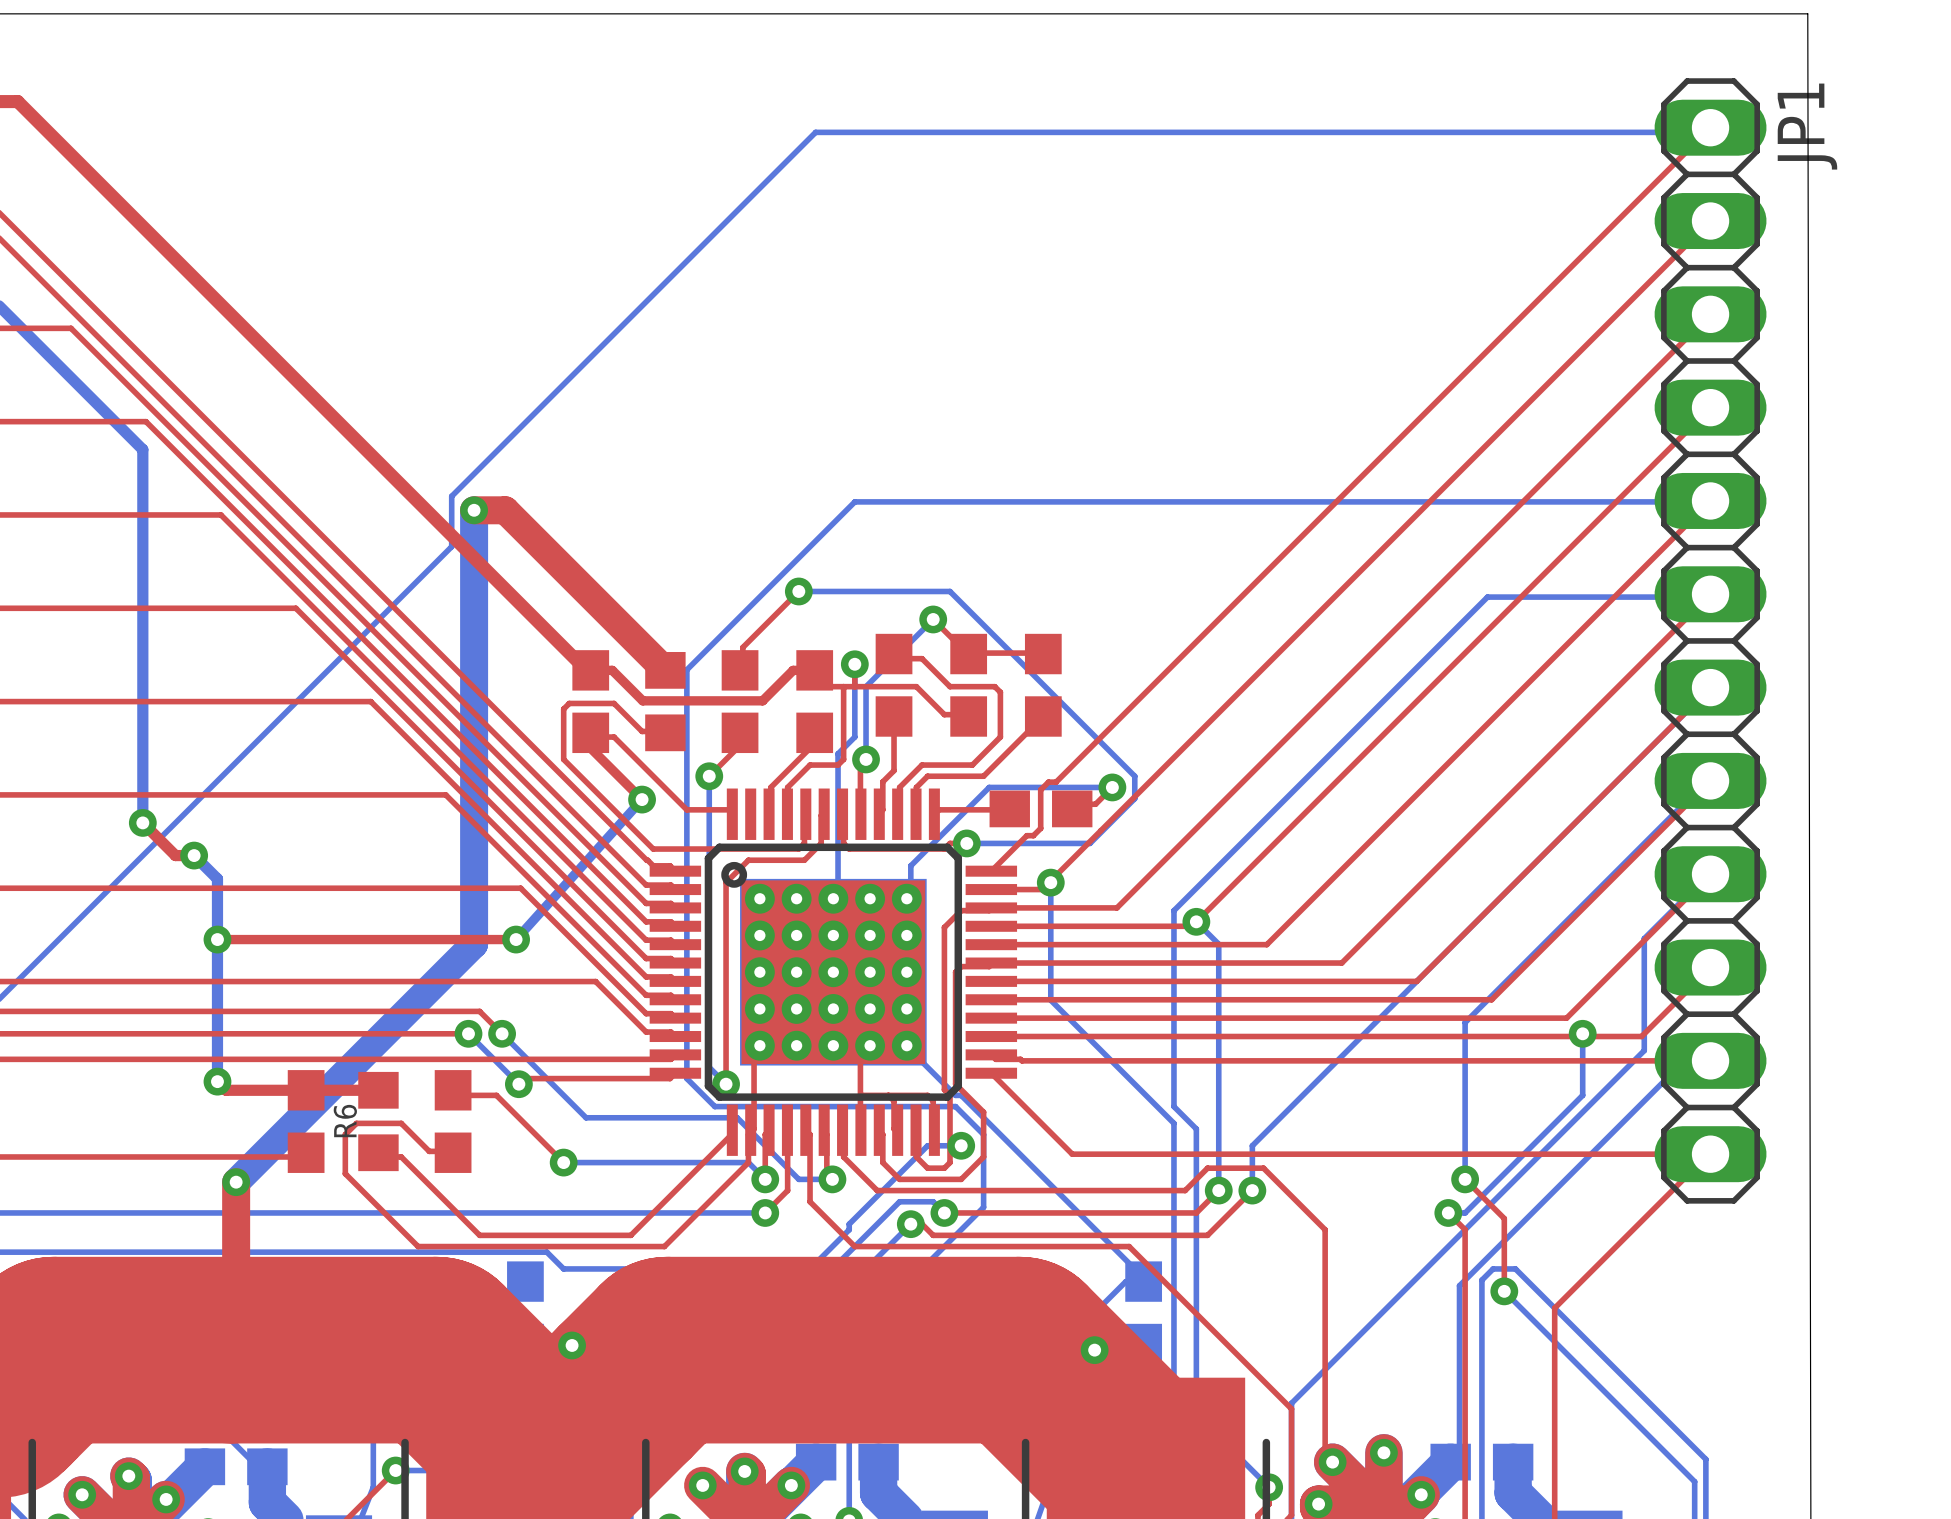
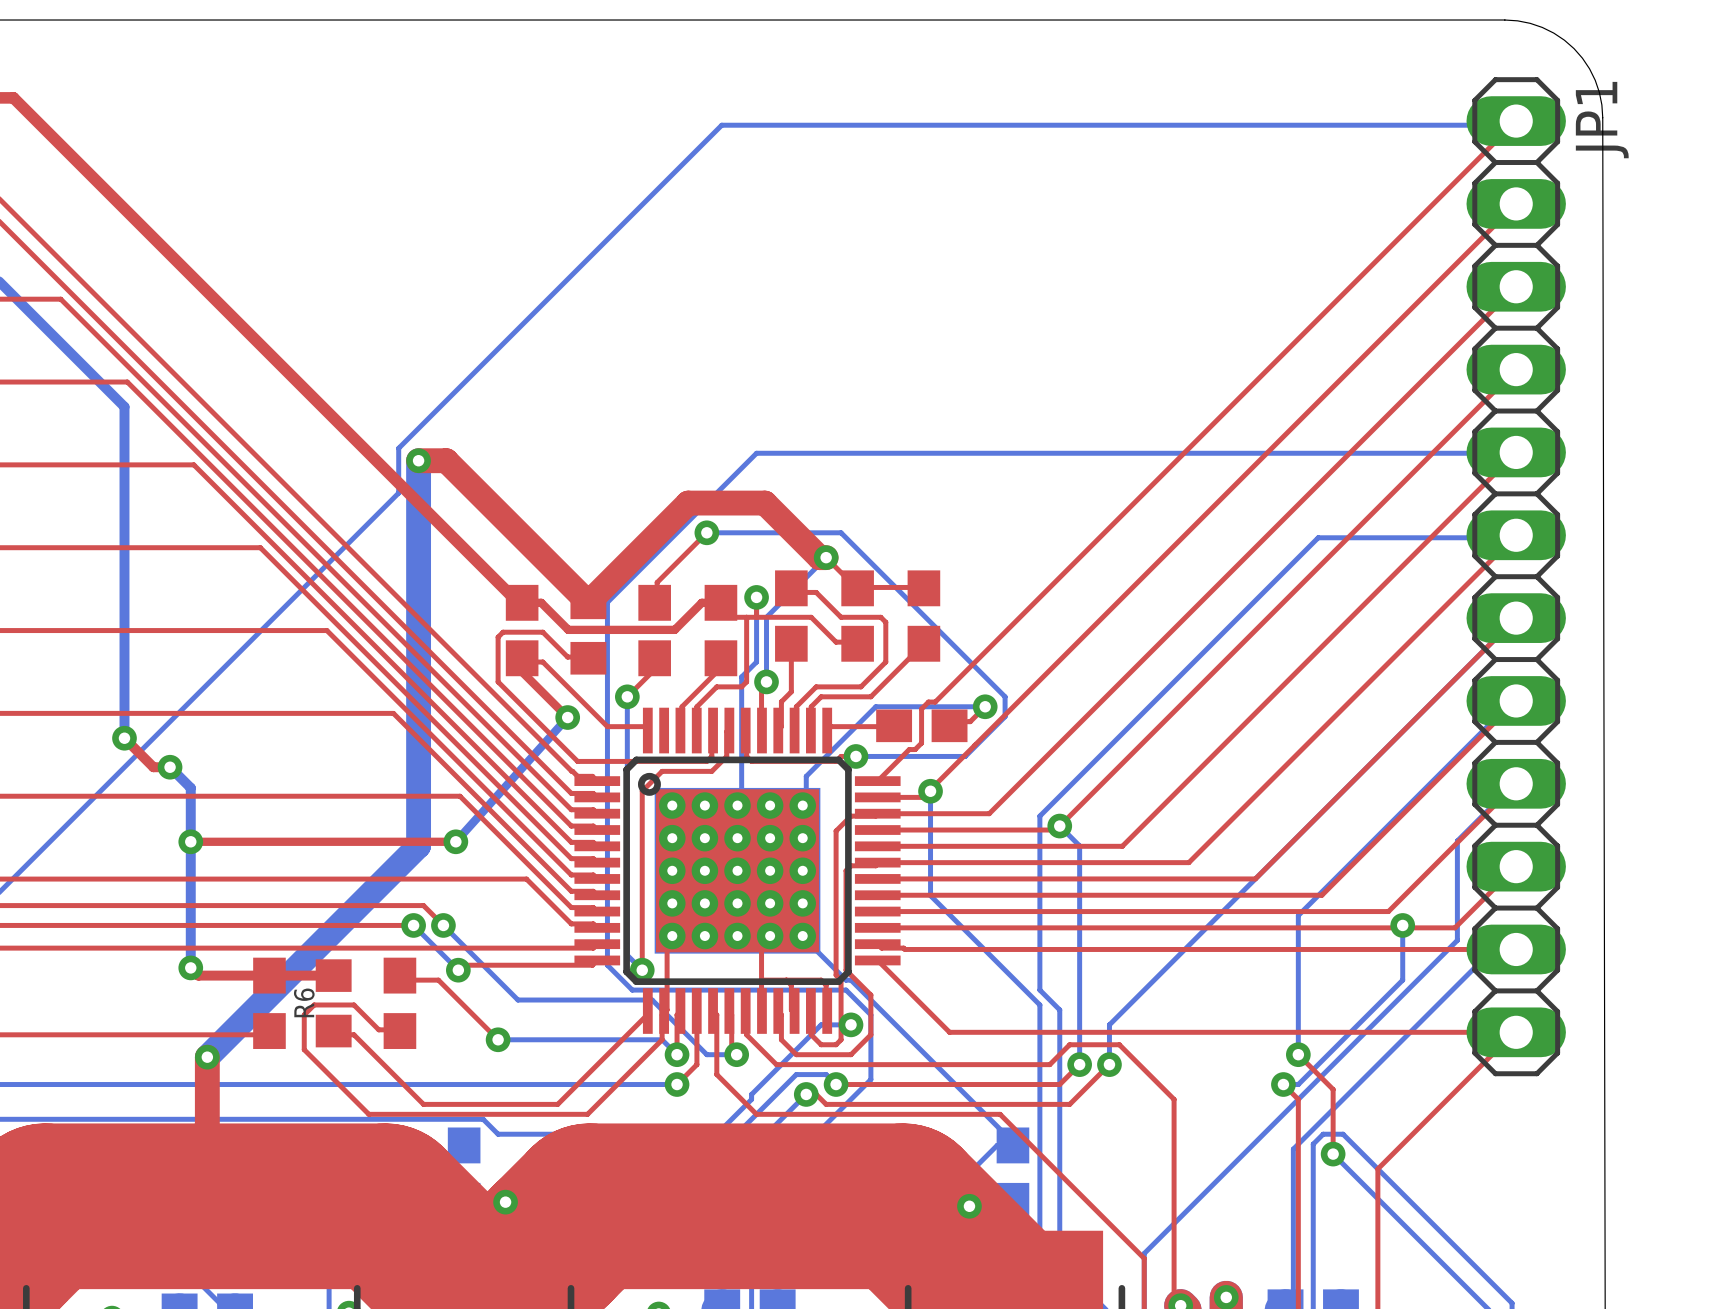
board edge: (1697, 13) (1807, 13) (1808, 123) -> (1504, 20) (1517, 20) (1542, 27) (1564, 40) (1574, 48) (1589, 68) (1595, 80) (1599, 92) (1602, 117)
top track: none -> (826, 557) (819, 557) (764, 503) (688, 503) (588, 602)

